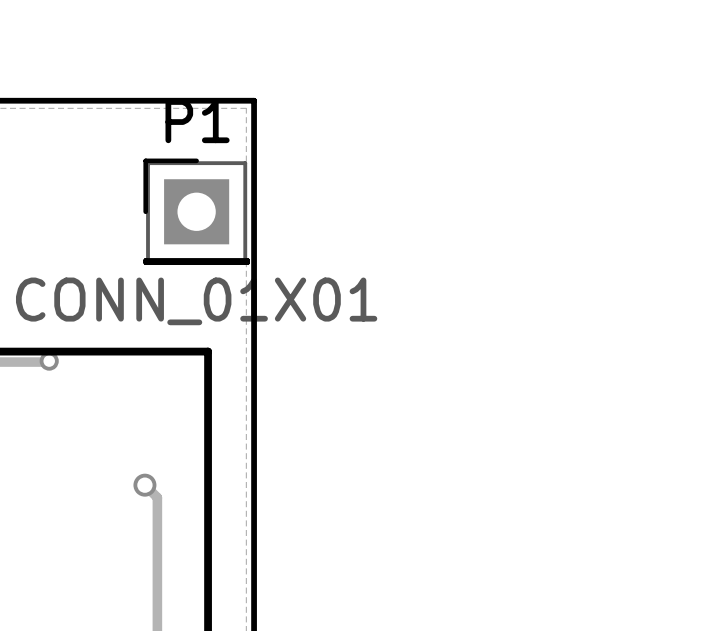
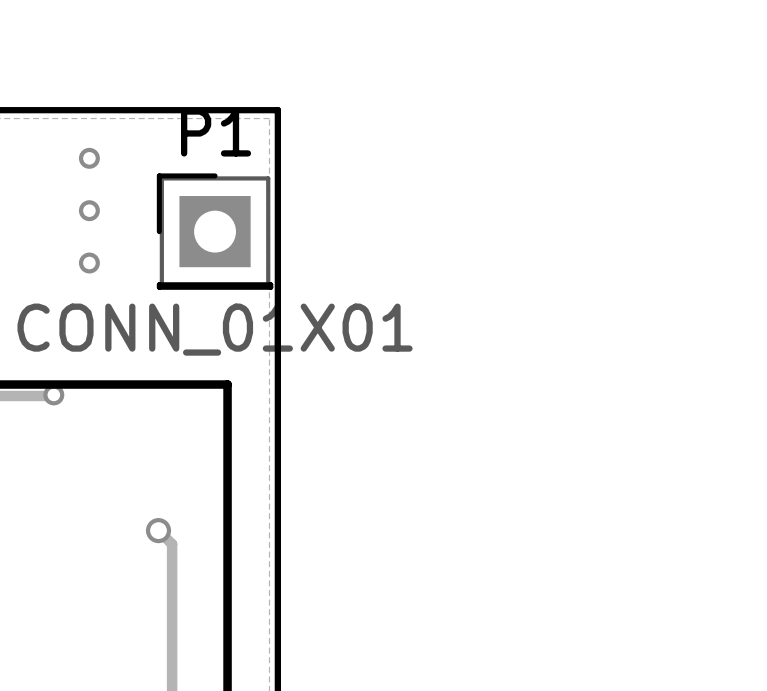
via: none -> (89, 158)
via: none -> (89, 210)
via: none -> (89, 263)

